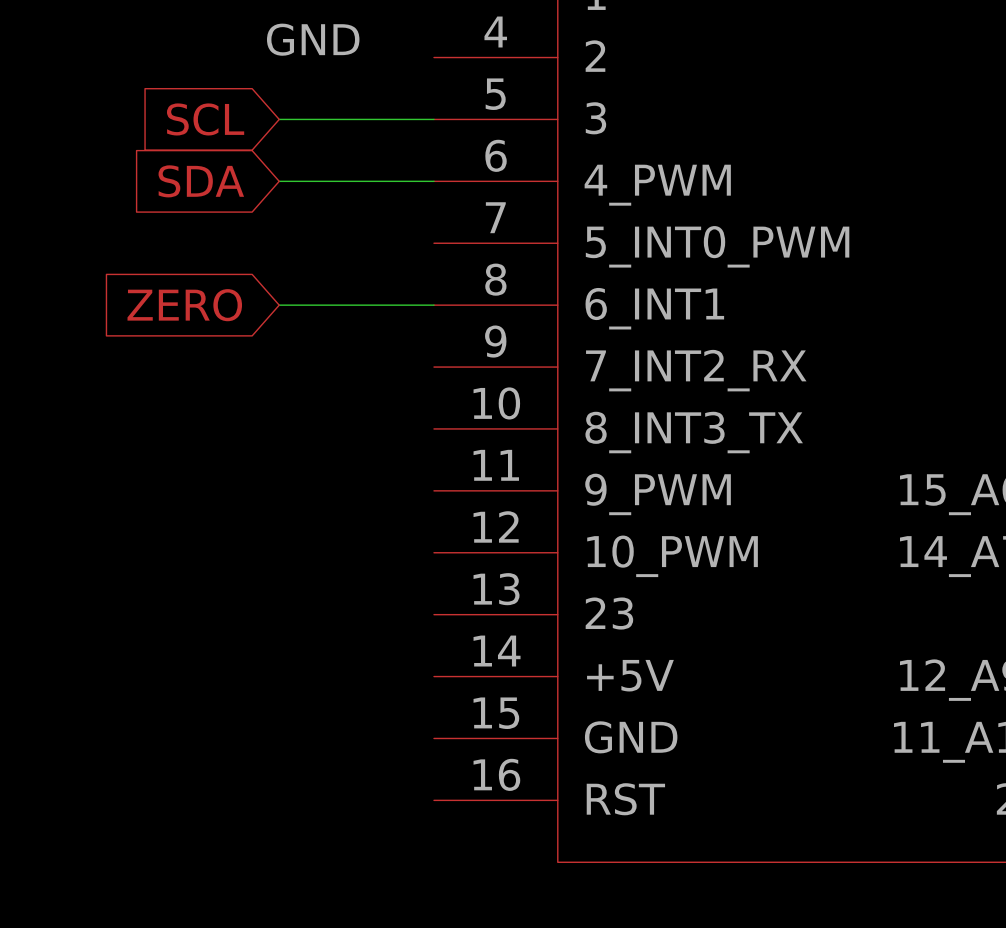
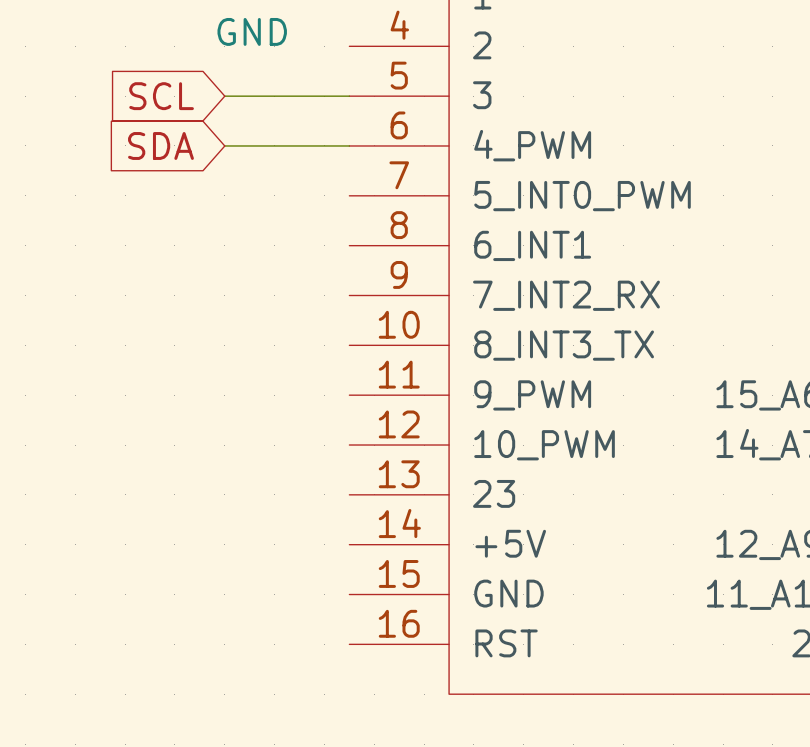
global label: ZERO (184, 305) -> none
wire: (279, 305) (433, 305) -> none

